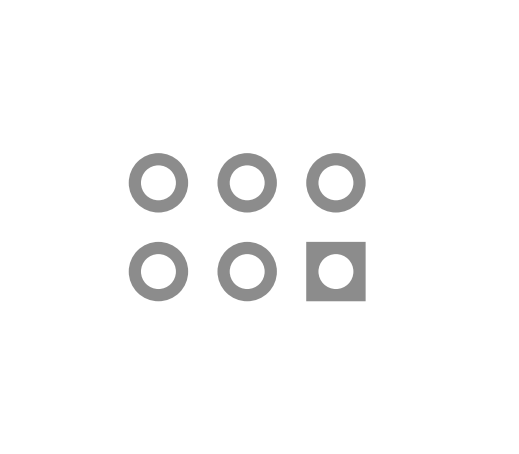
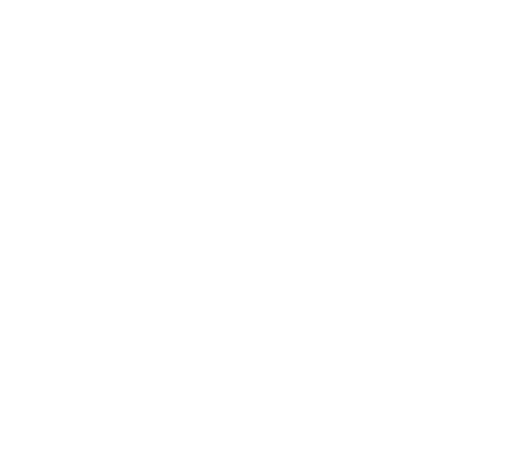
part: (247, 227) -> none

